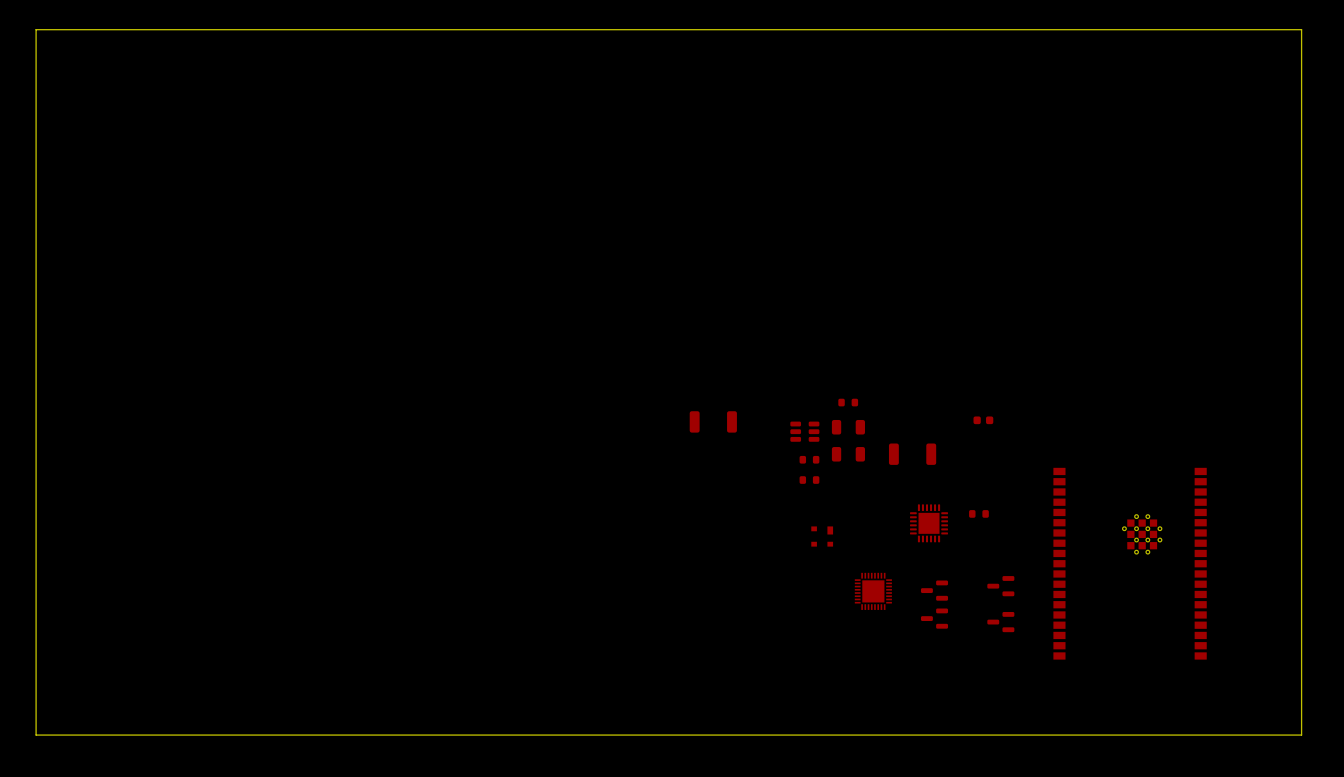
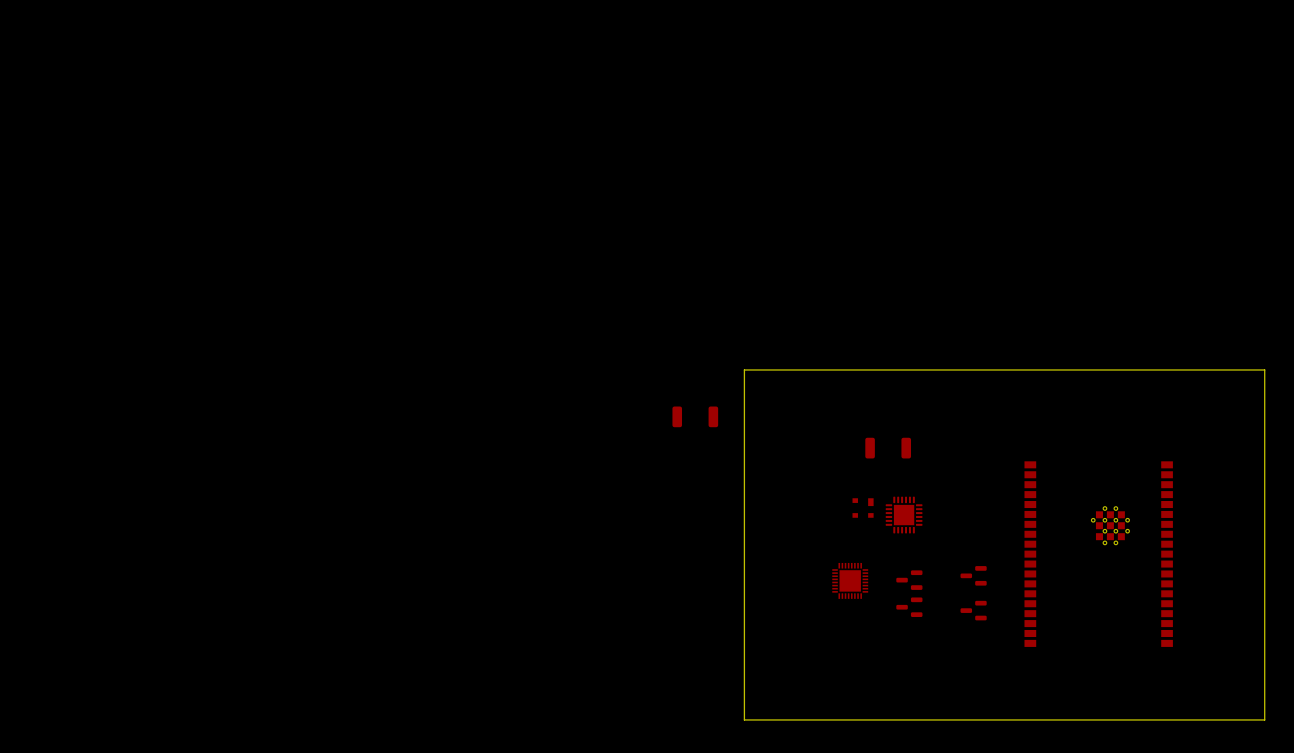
board edge: (1301, 373) (1301, 29) (36, 29) (36, 735) (764, 735) -> (1264, 369) (744, 369) (744, 719)
part: (848, 402) -> none
part: (983, 420) -> none
part: (848, 427) -> none
part: (804, 431) -> none
part: (848, 454) -> none
part: (809, 459) -> none
part: (809, 480) -> none
part: (978, 513) -> none
part position: (822, 536) -> (863, 508)

